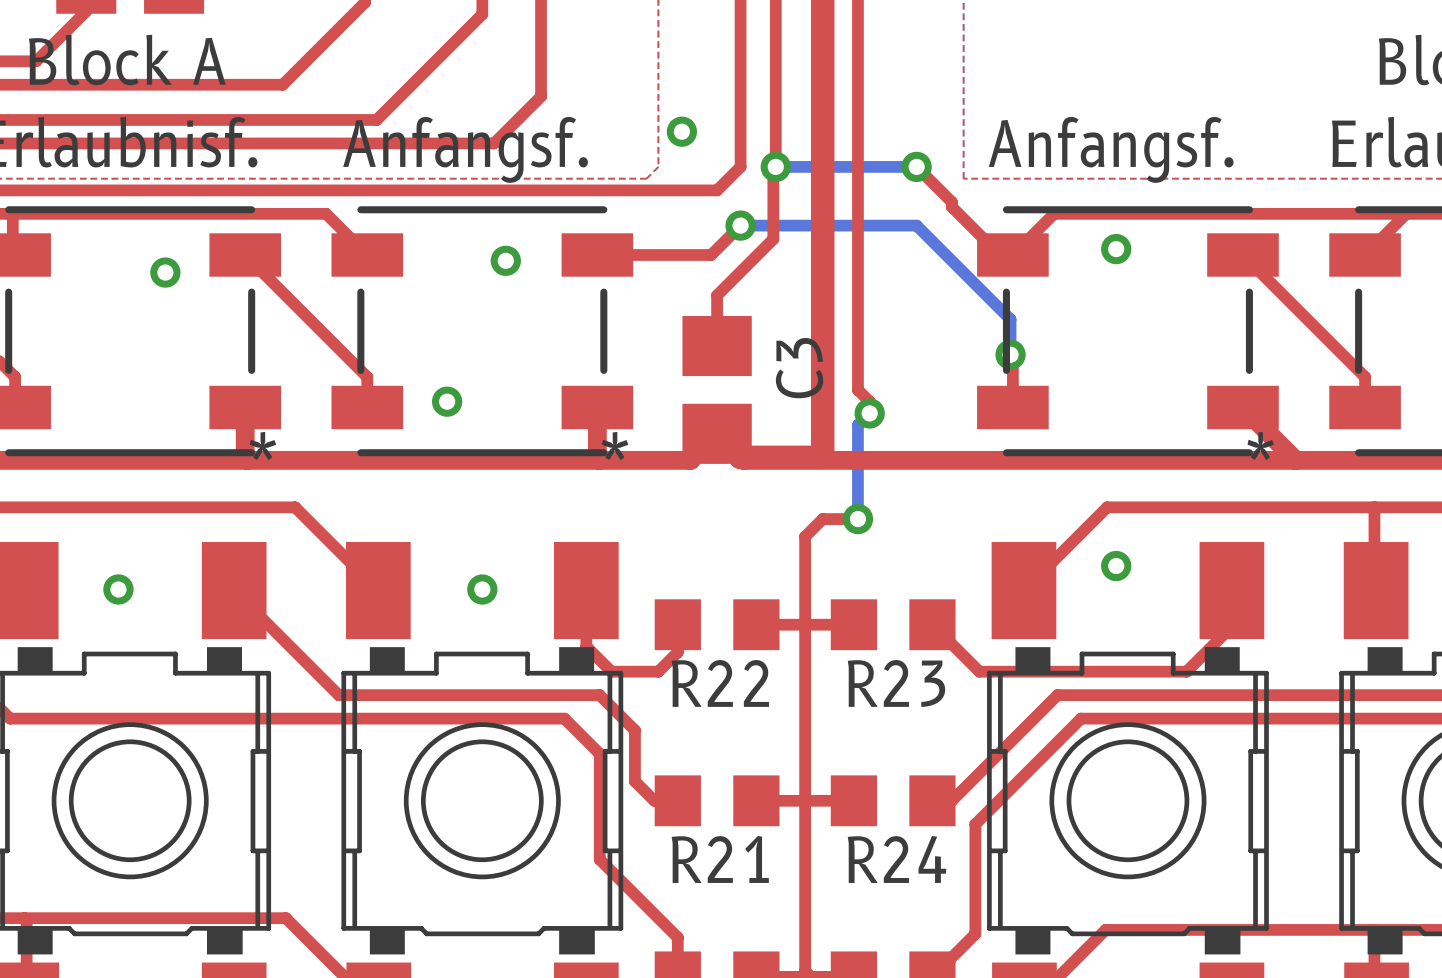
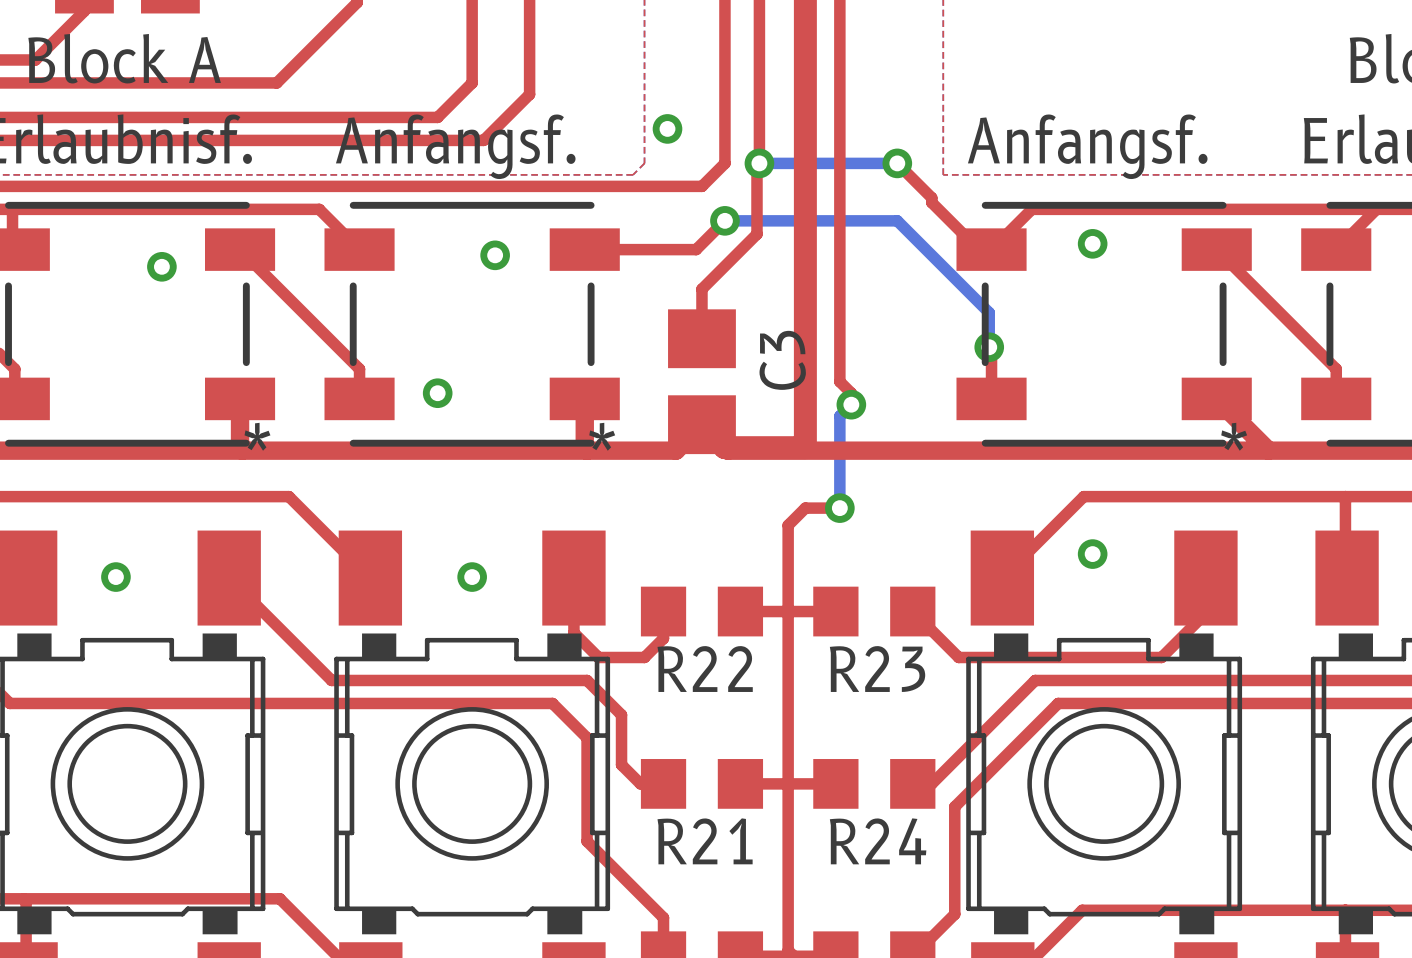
top track: (482, 14) (376, 119) -> (472, 14) (472, 82) (437, 117) (368, 117)

